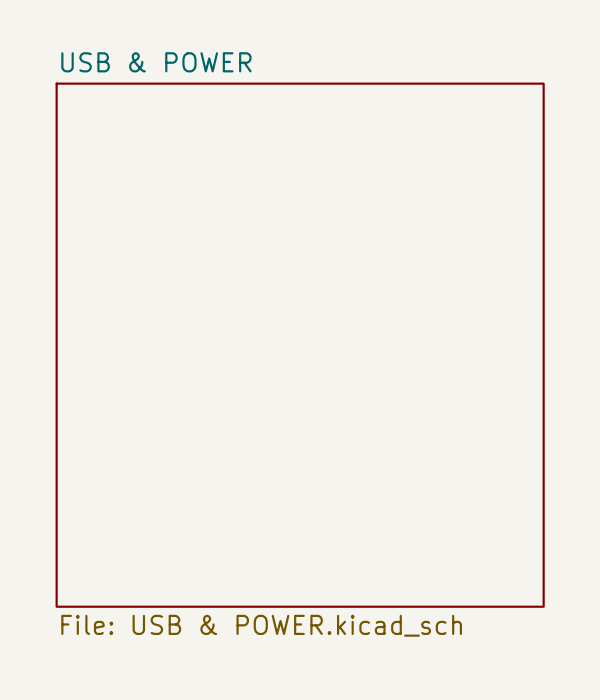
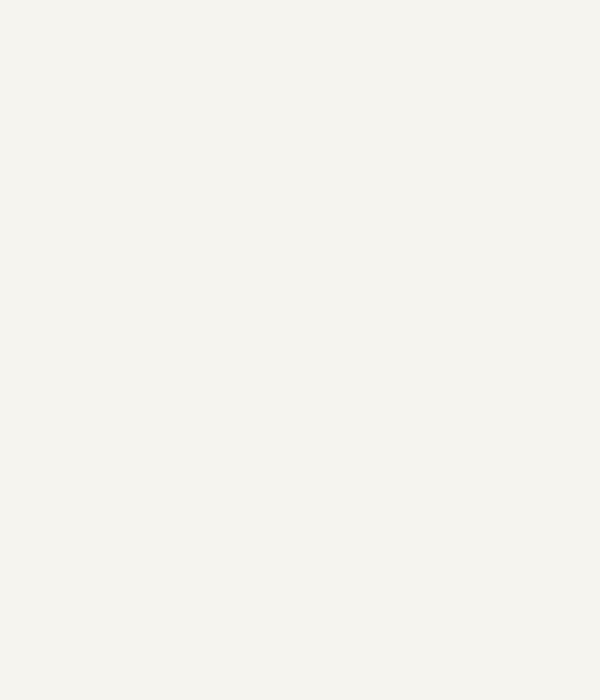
sheet USB & POWER: File: USB & POWER.kicad_sch (300, 345) -> none

